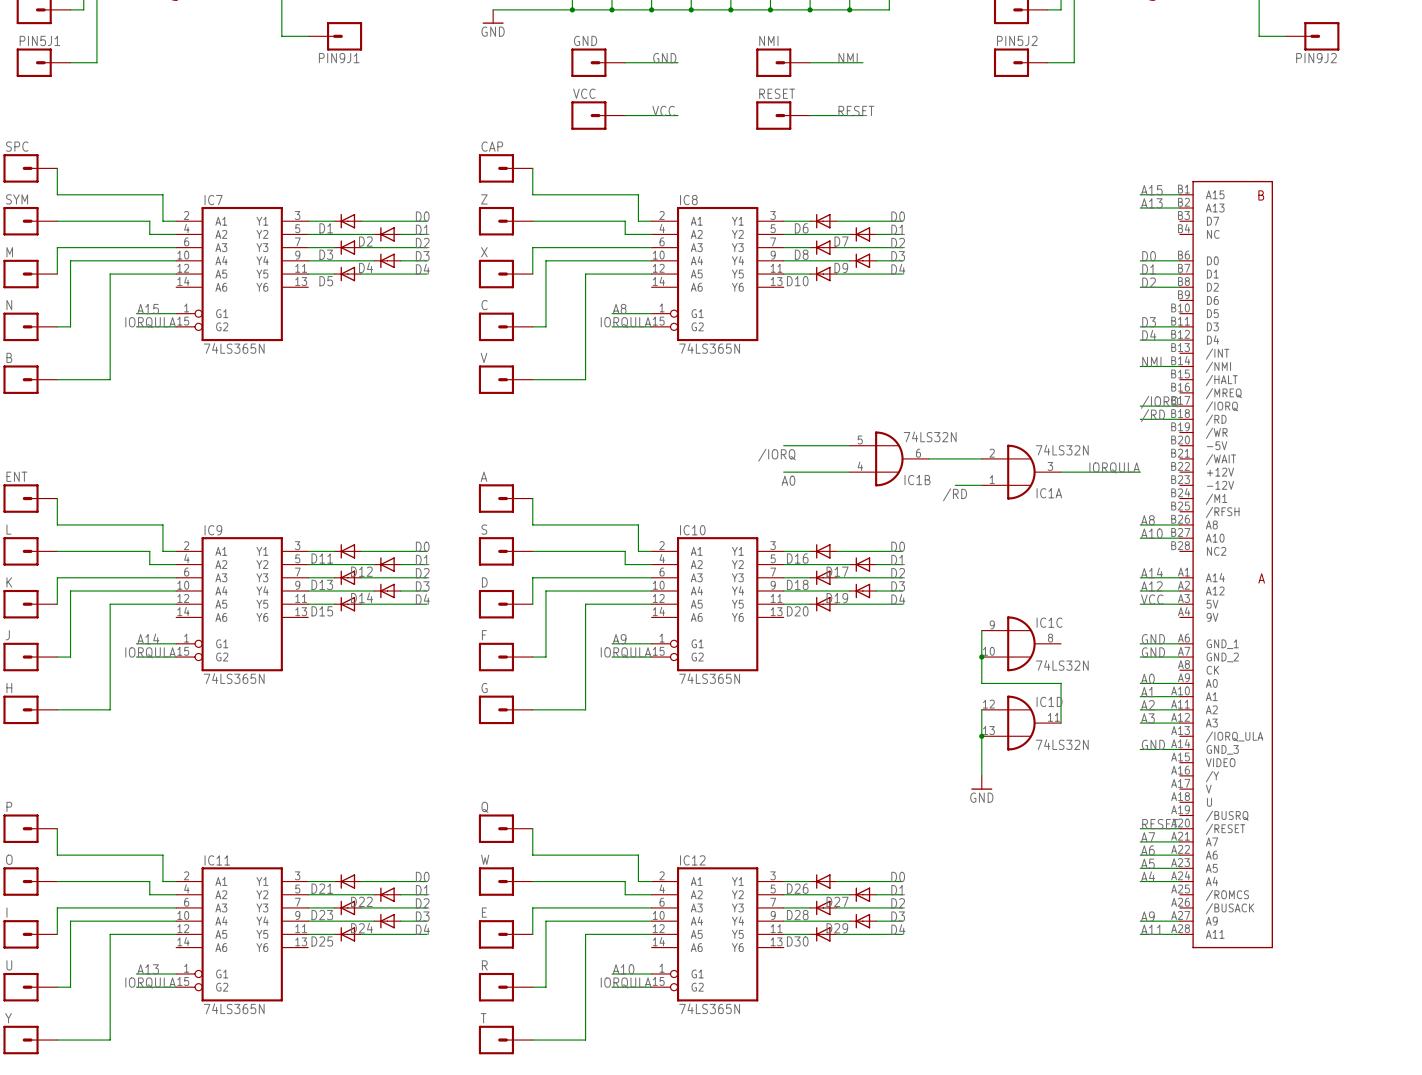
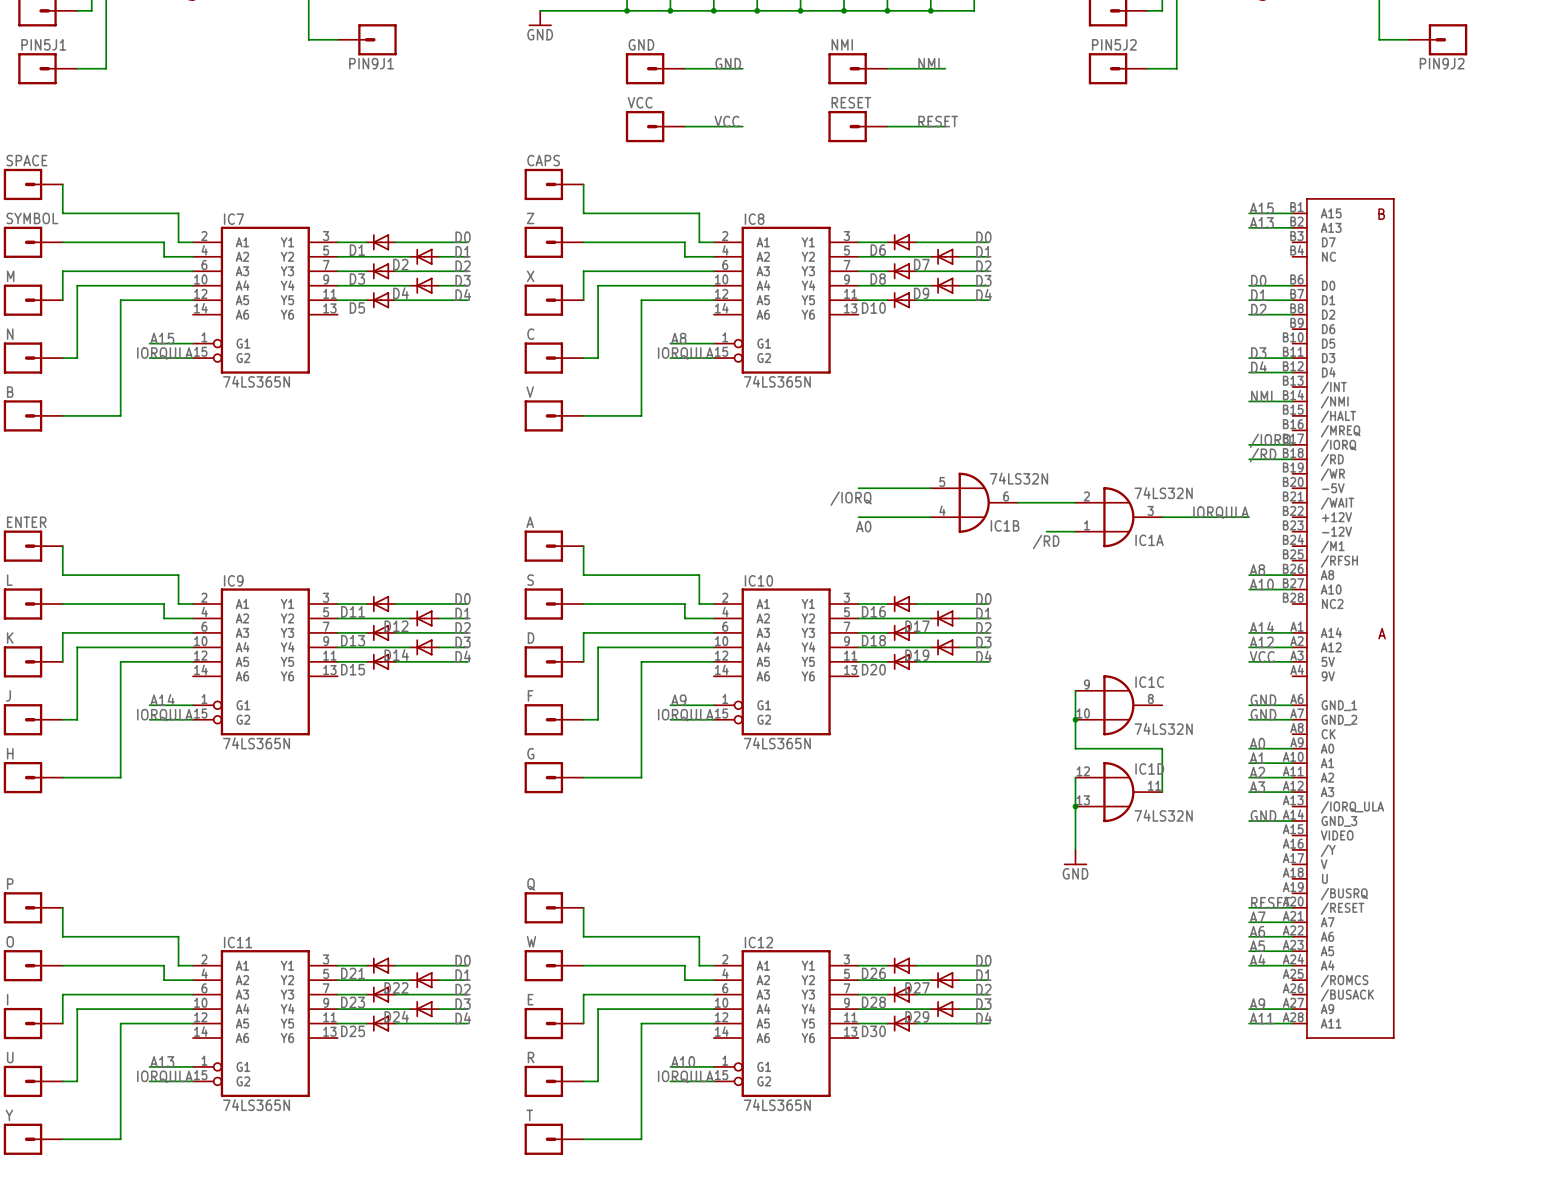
SPC name: SPC (17, 146) -> SPACE (26, 160)
CAP name: CAP (492, 146) -> CAPS (543, 160)
SYM name: SYM (17, 199) -> SYMBOL (32, 218)
ENT name: ENT (16, 476) -> ENTER (26, 522)

